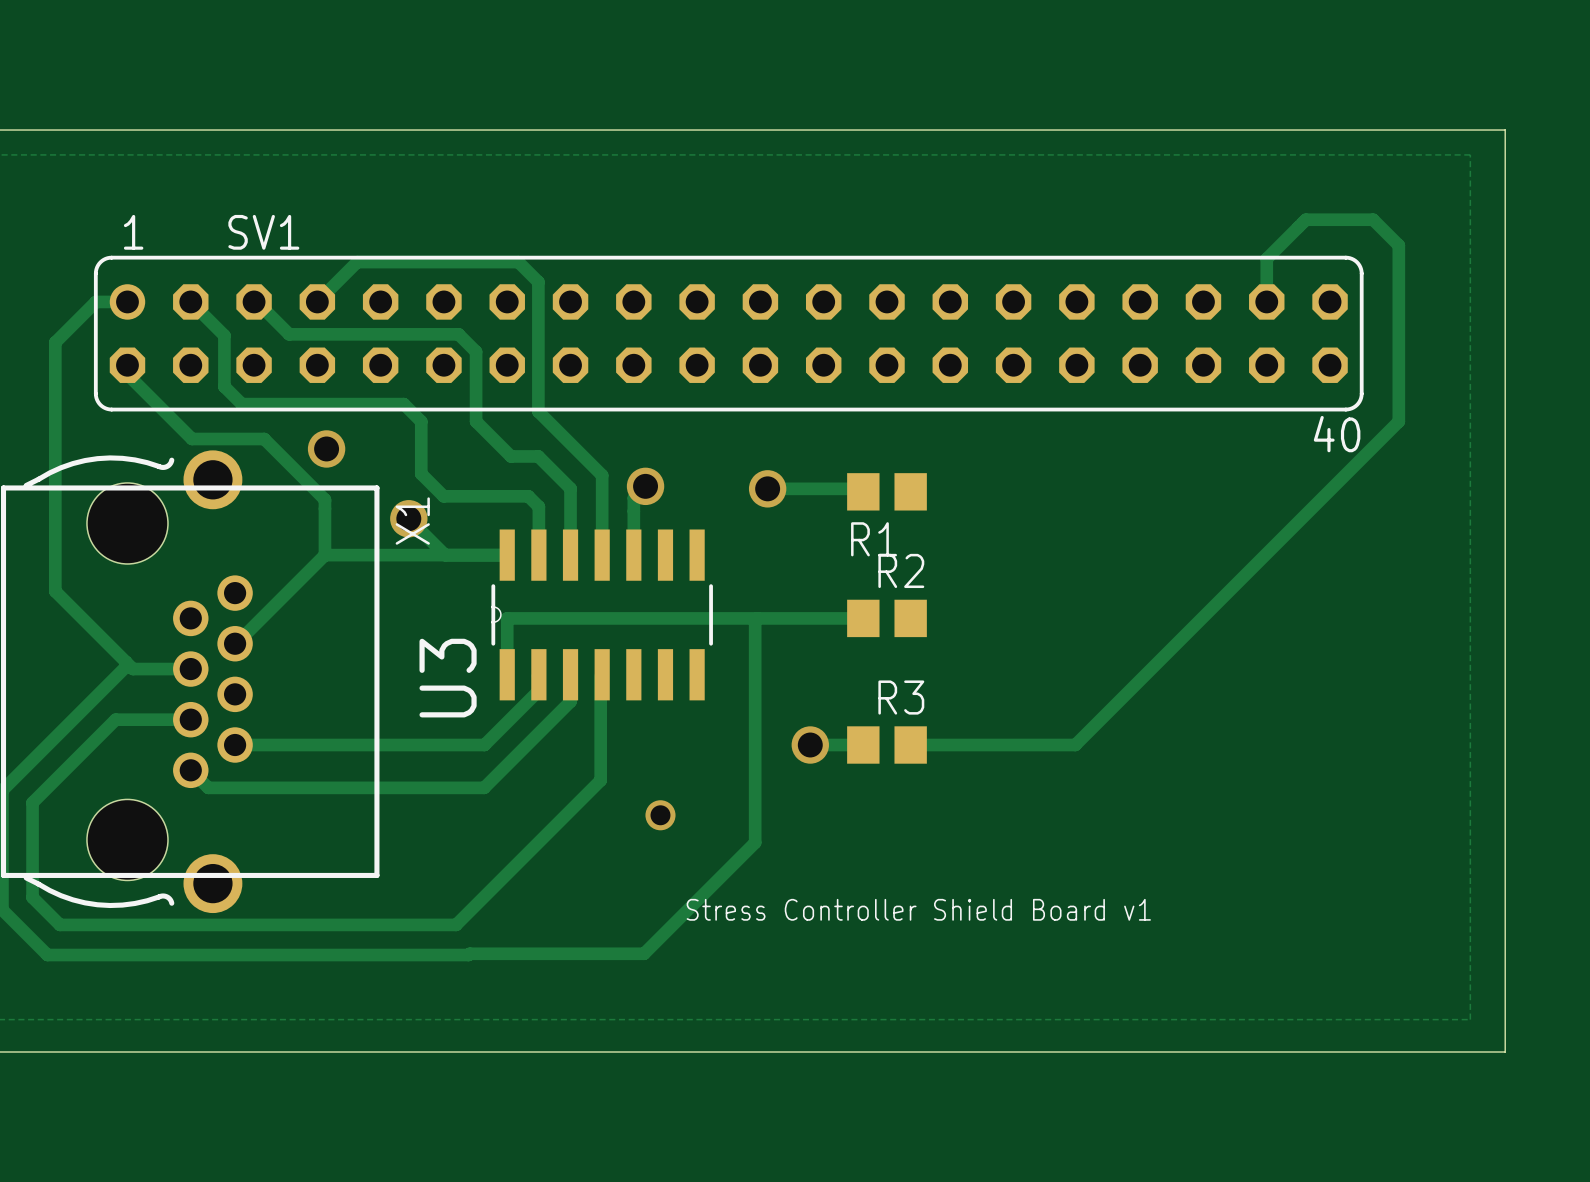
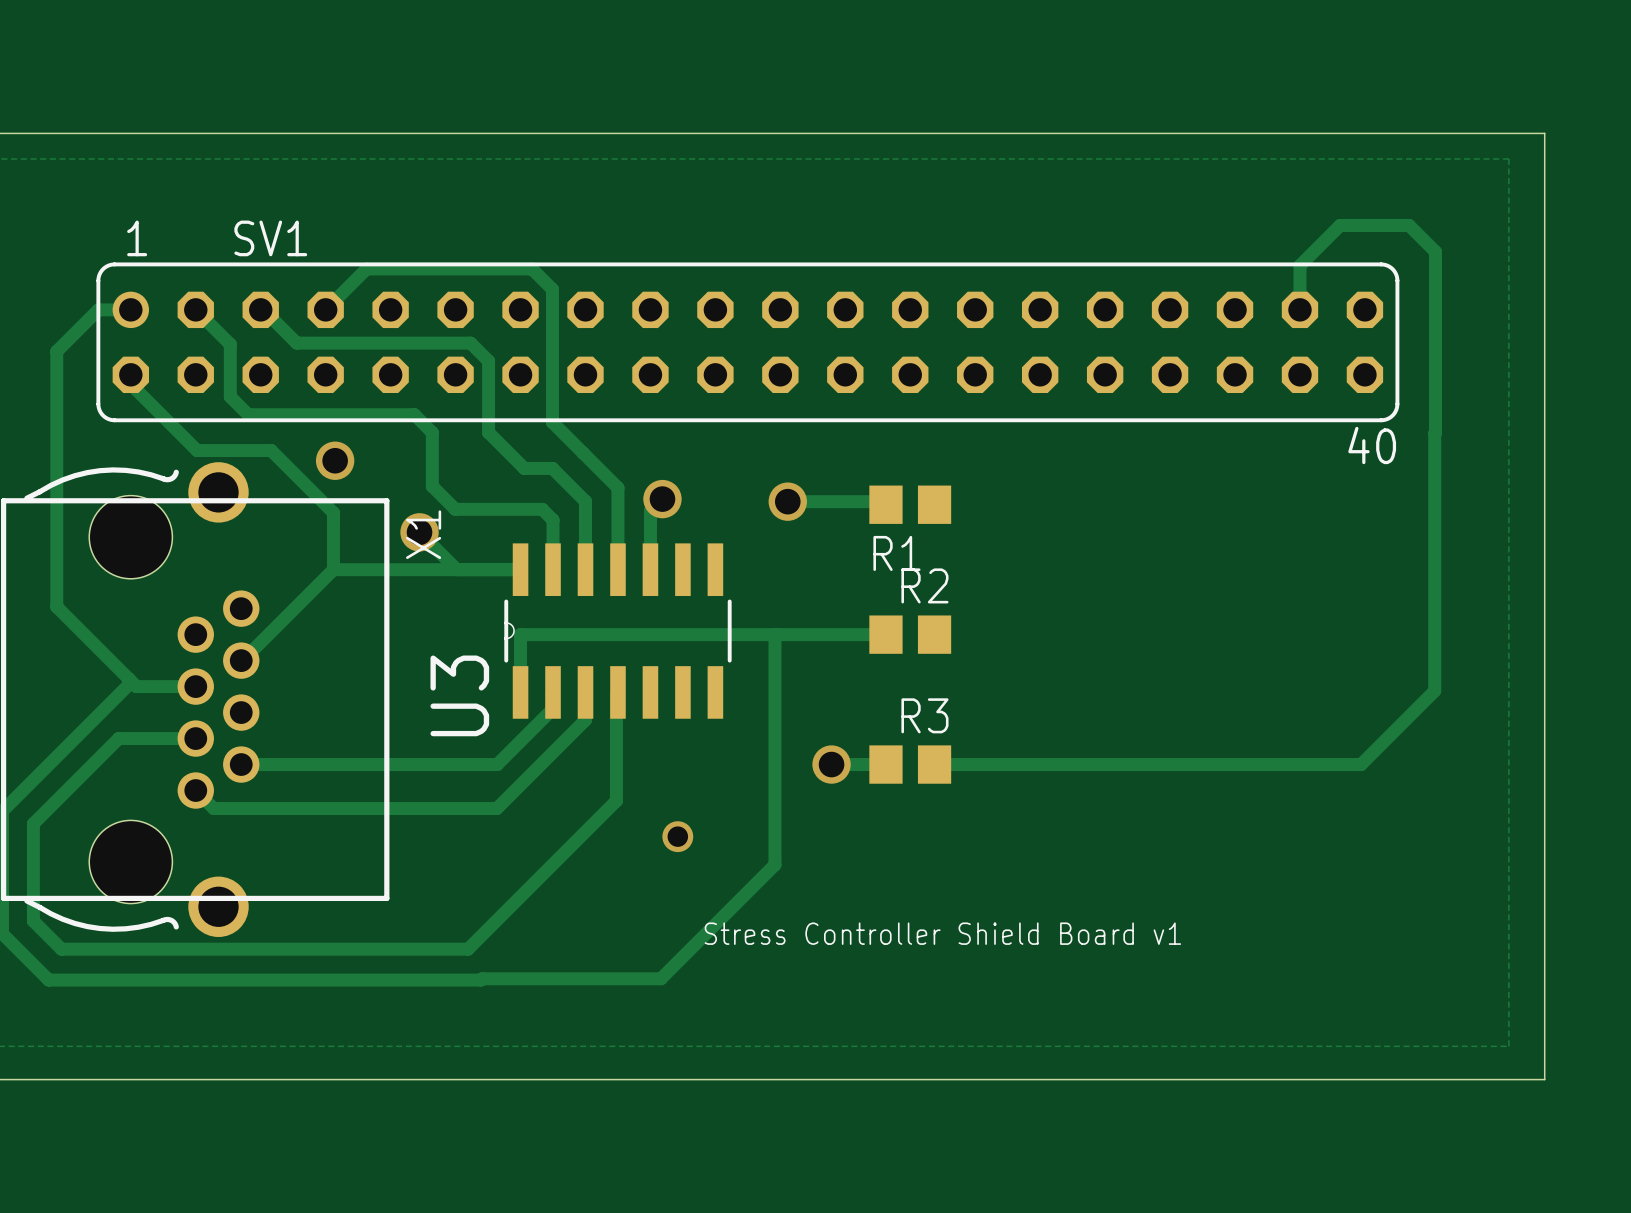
track: (1398, 422) (1075, 745) -> (1434, 433) (1434, 690) (1361, 764) (1103, 764)

